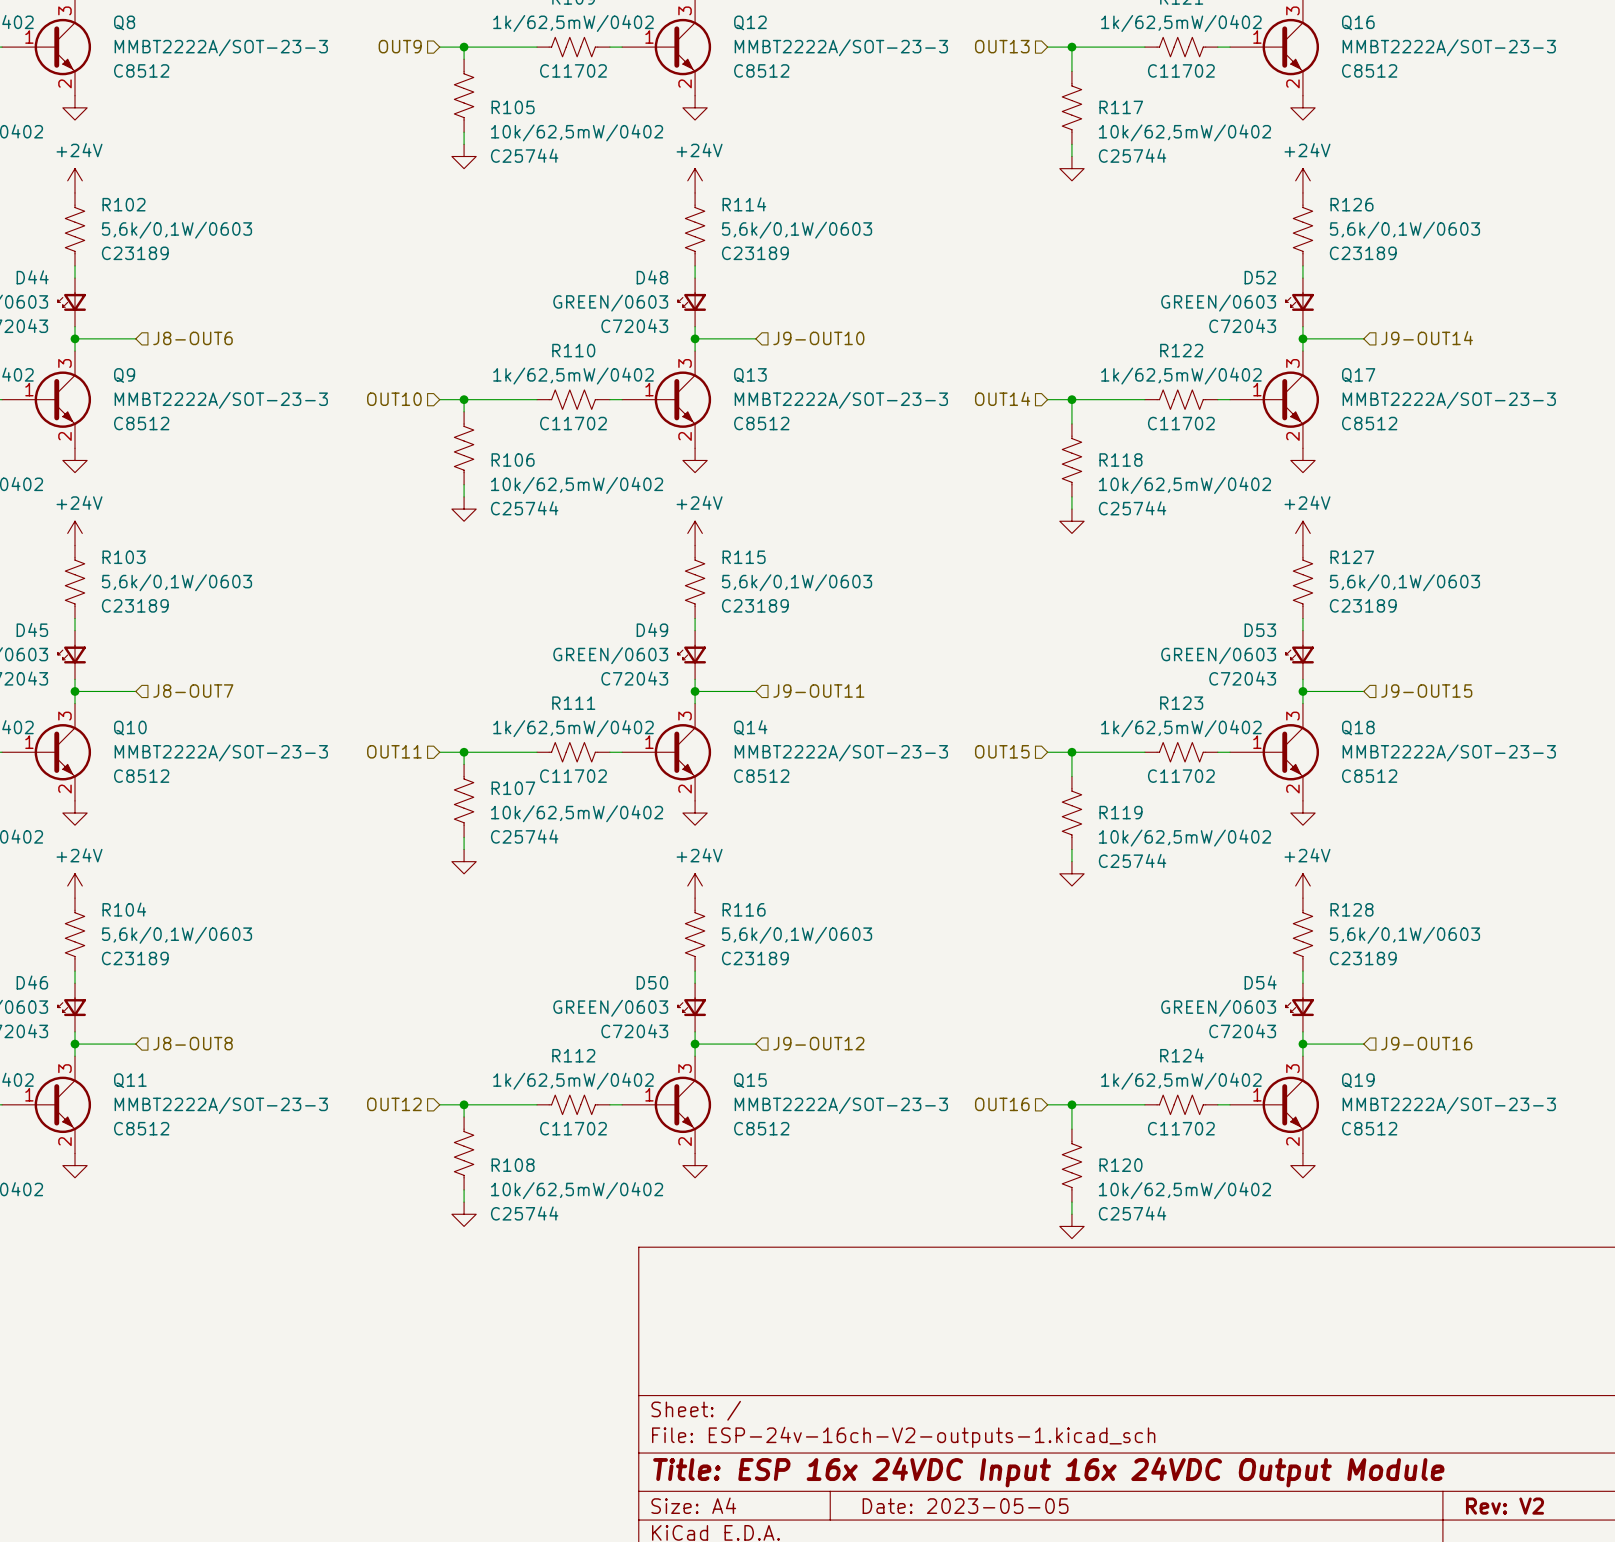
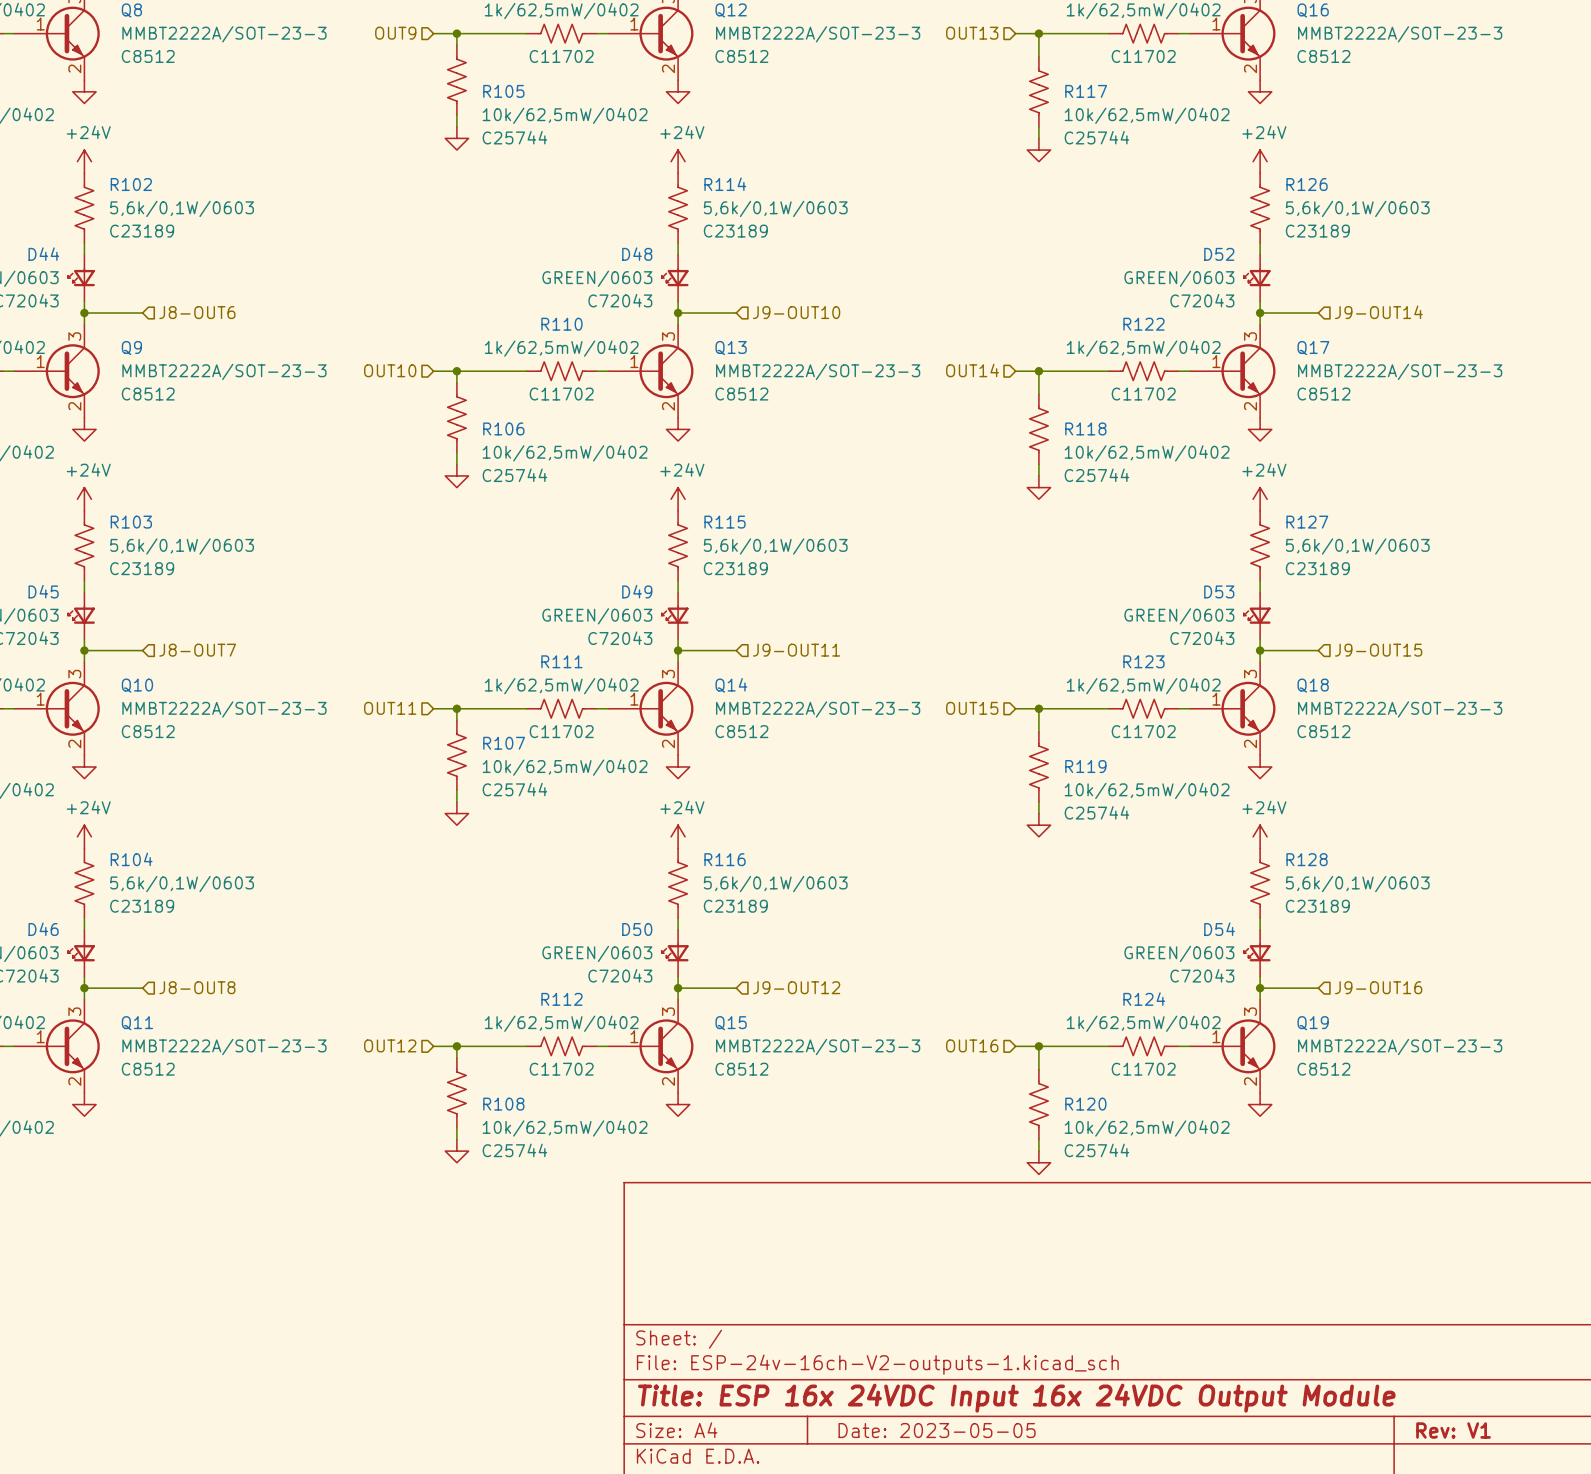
title block: Rev: V2 (1504, 1506) -> Rev: V1 (1453, 1430)

